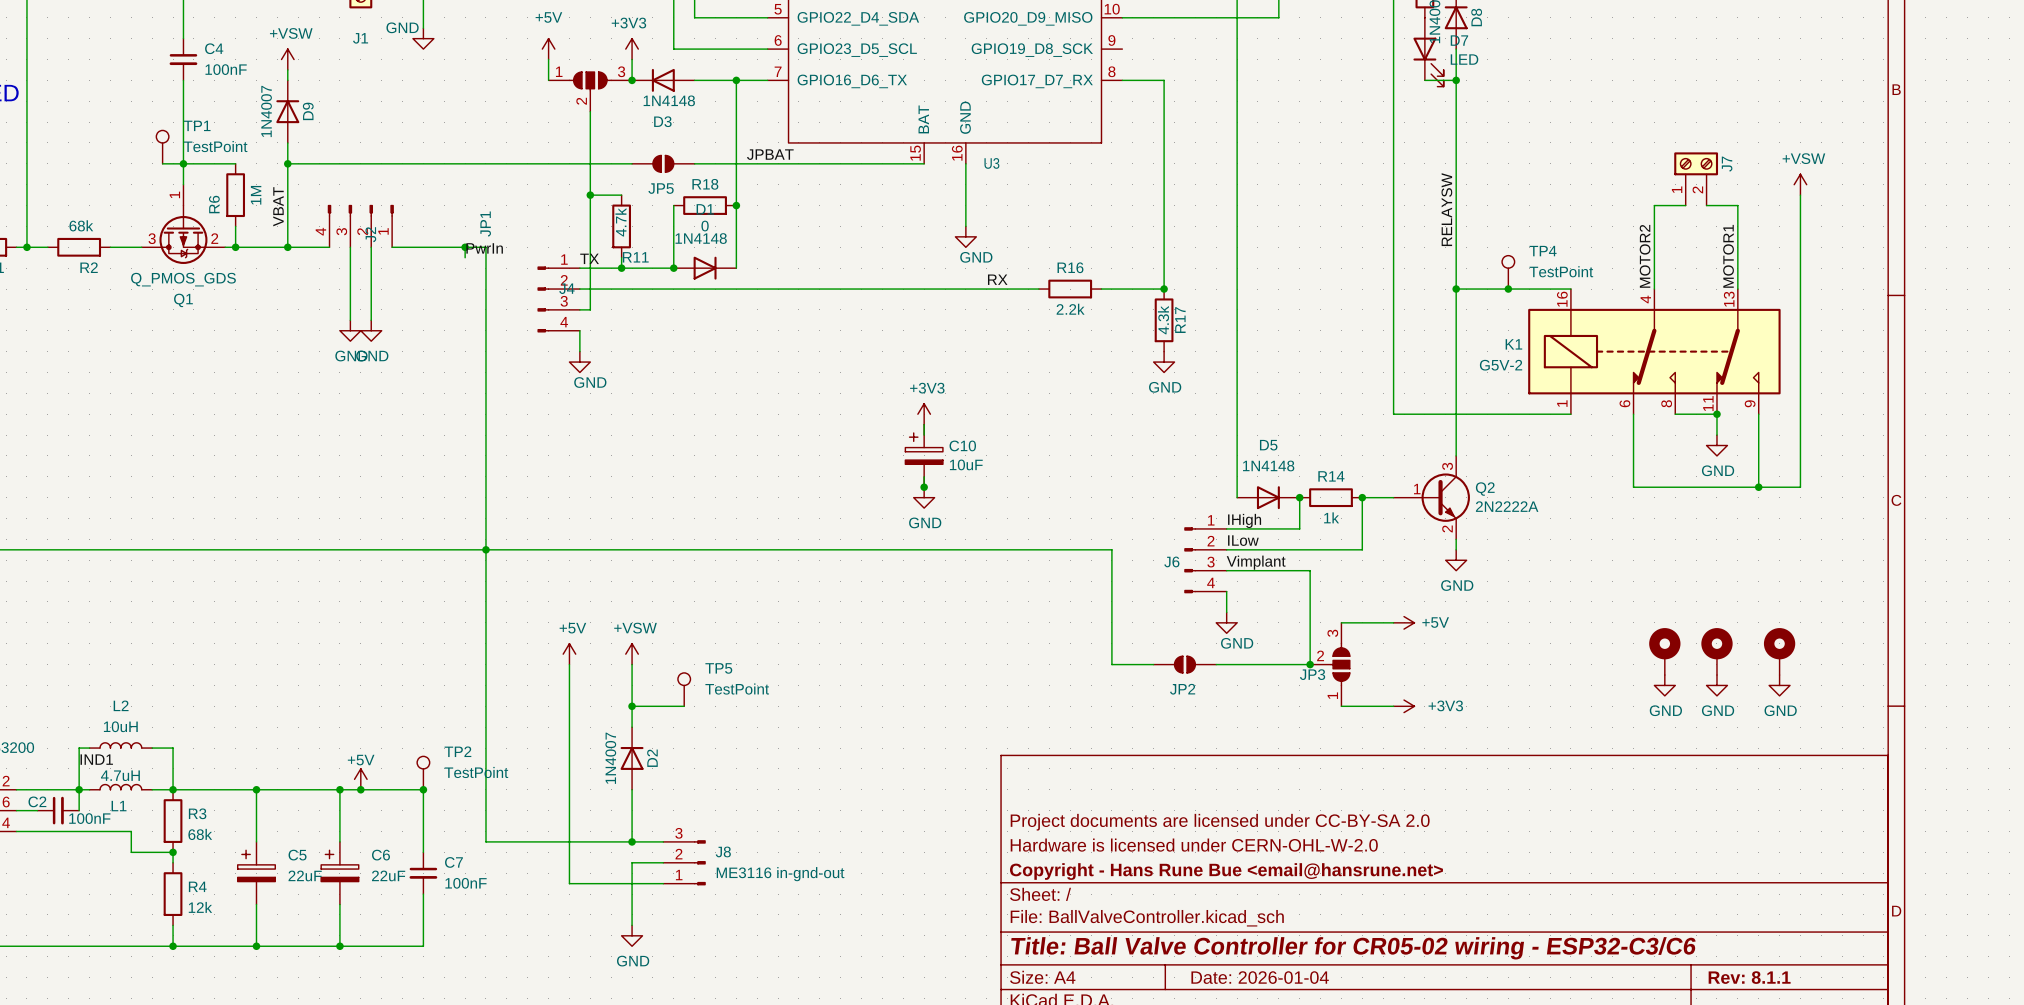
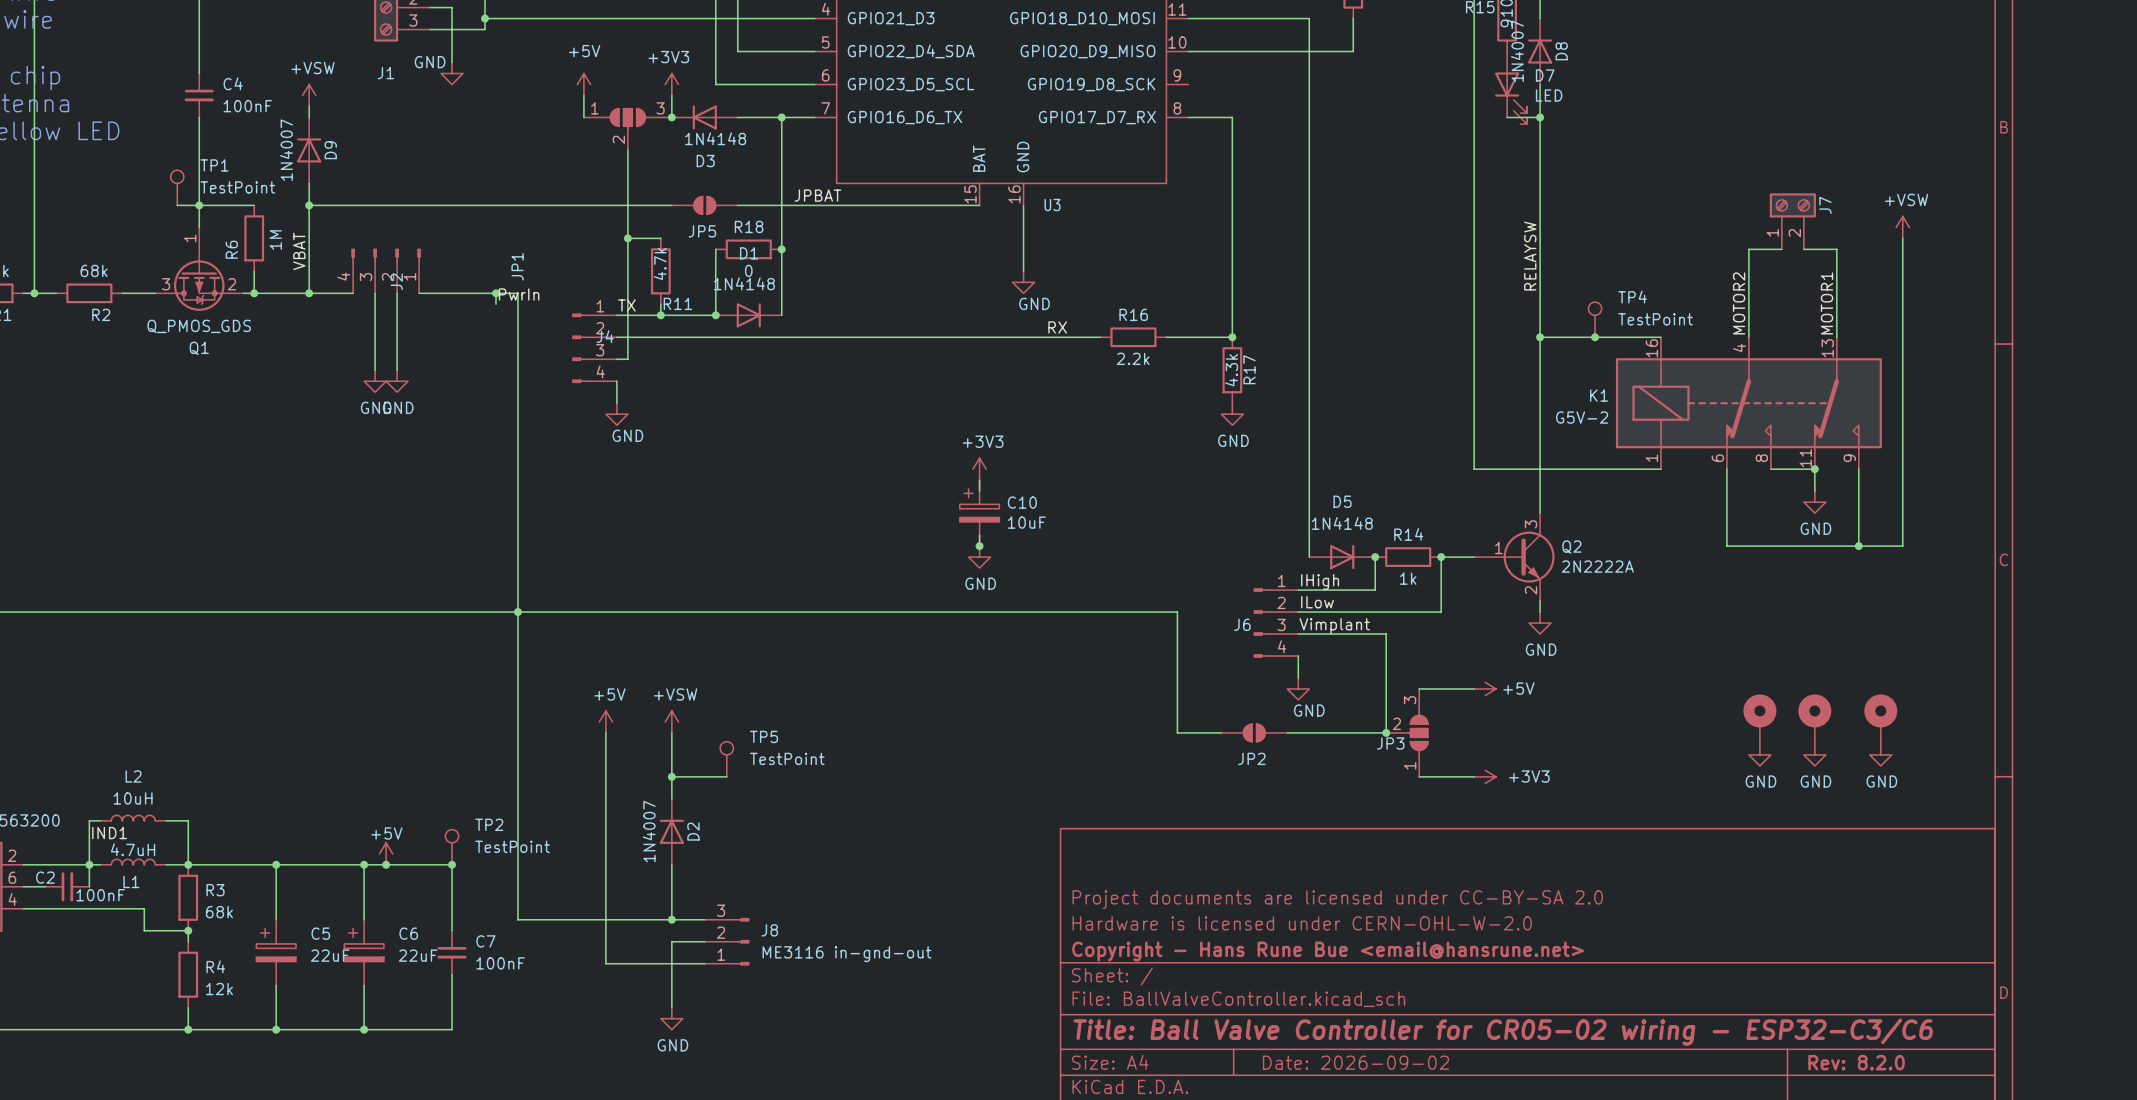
title block: Date: 2026-01-04 (1260, 977) -> Date: 2026-09-02 (1355, 1062)
title block: Rev: 8.1.1 (1749, 977) -> Rev: 8.2.0 (1856, 1062)

